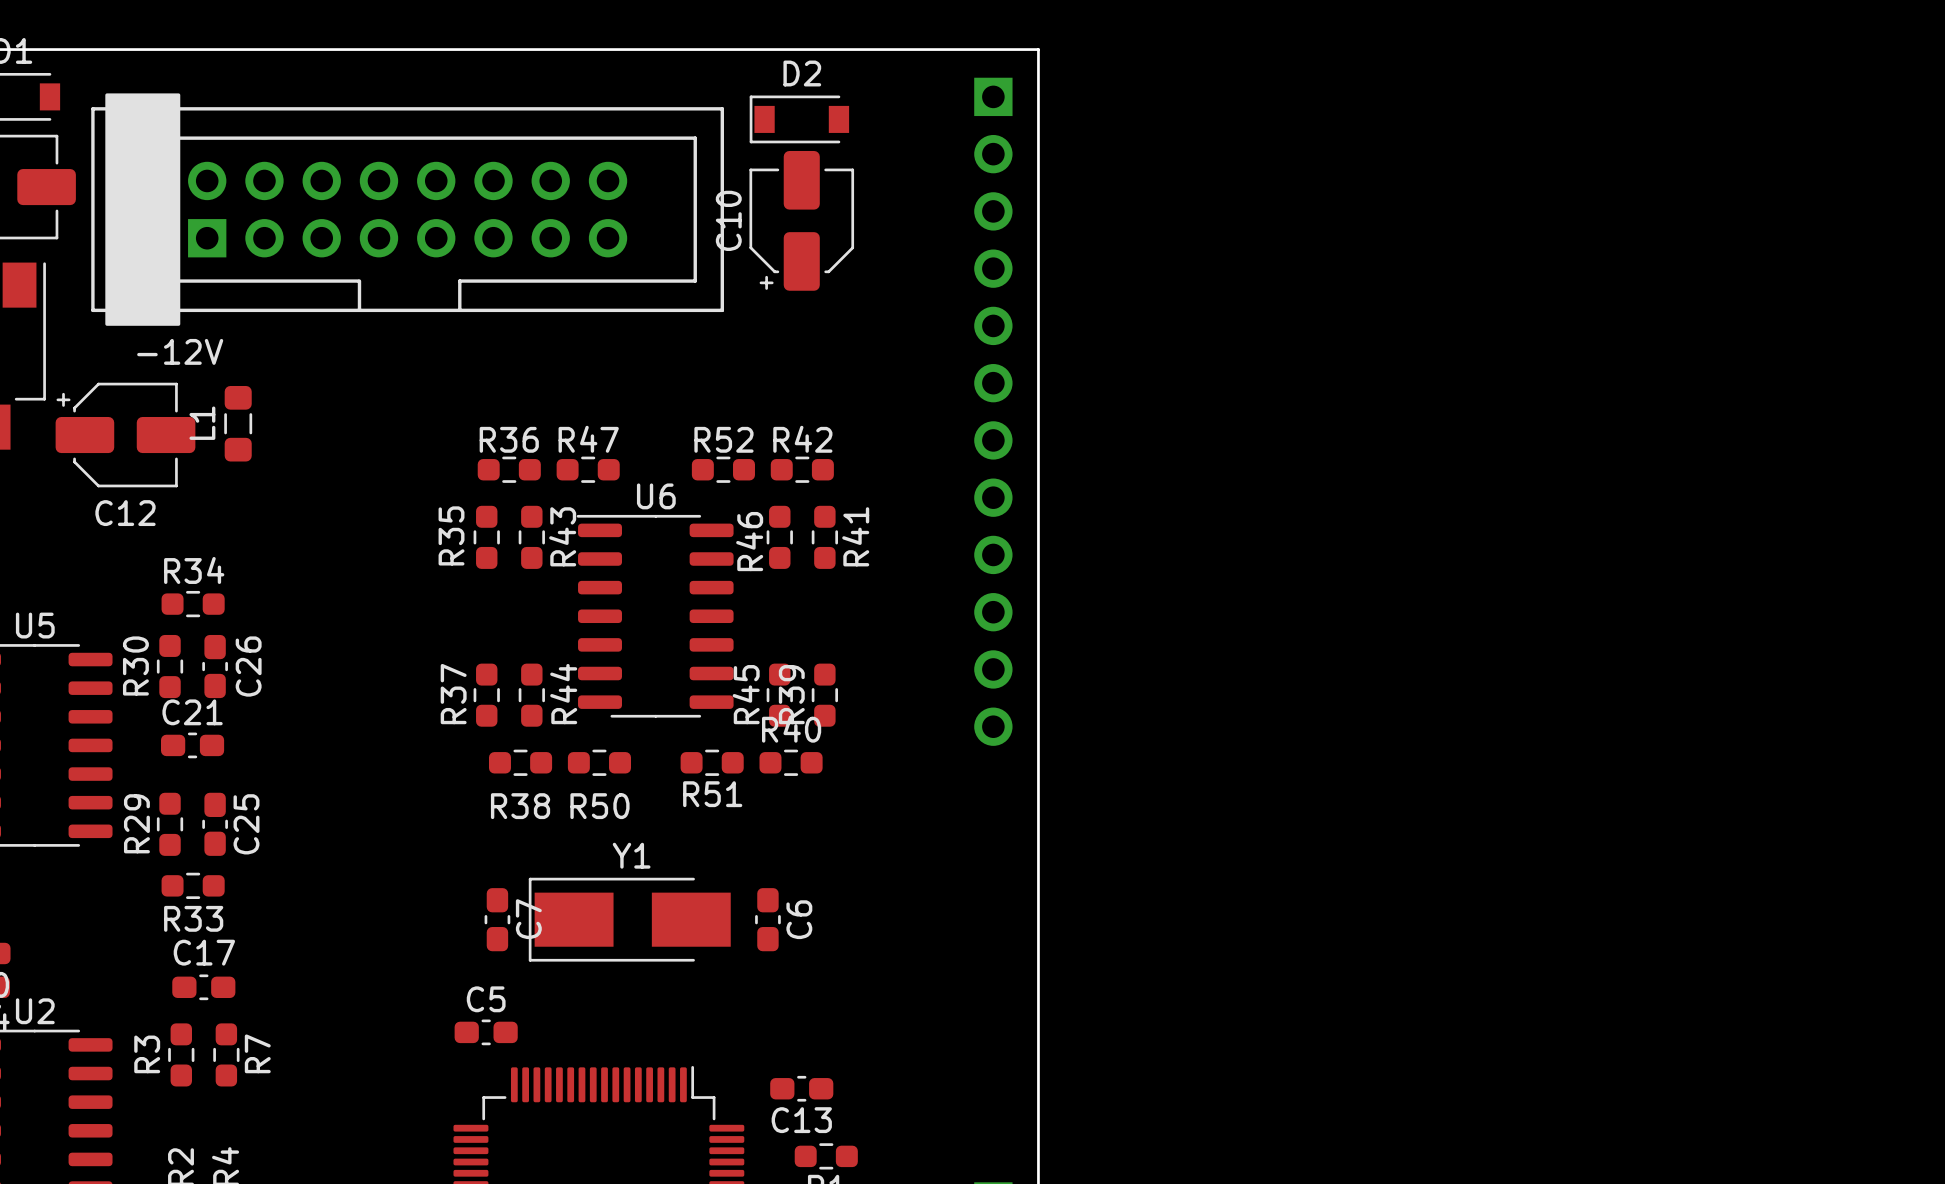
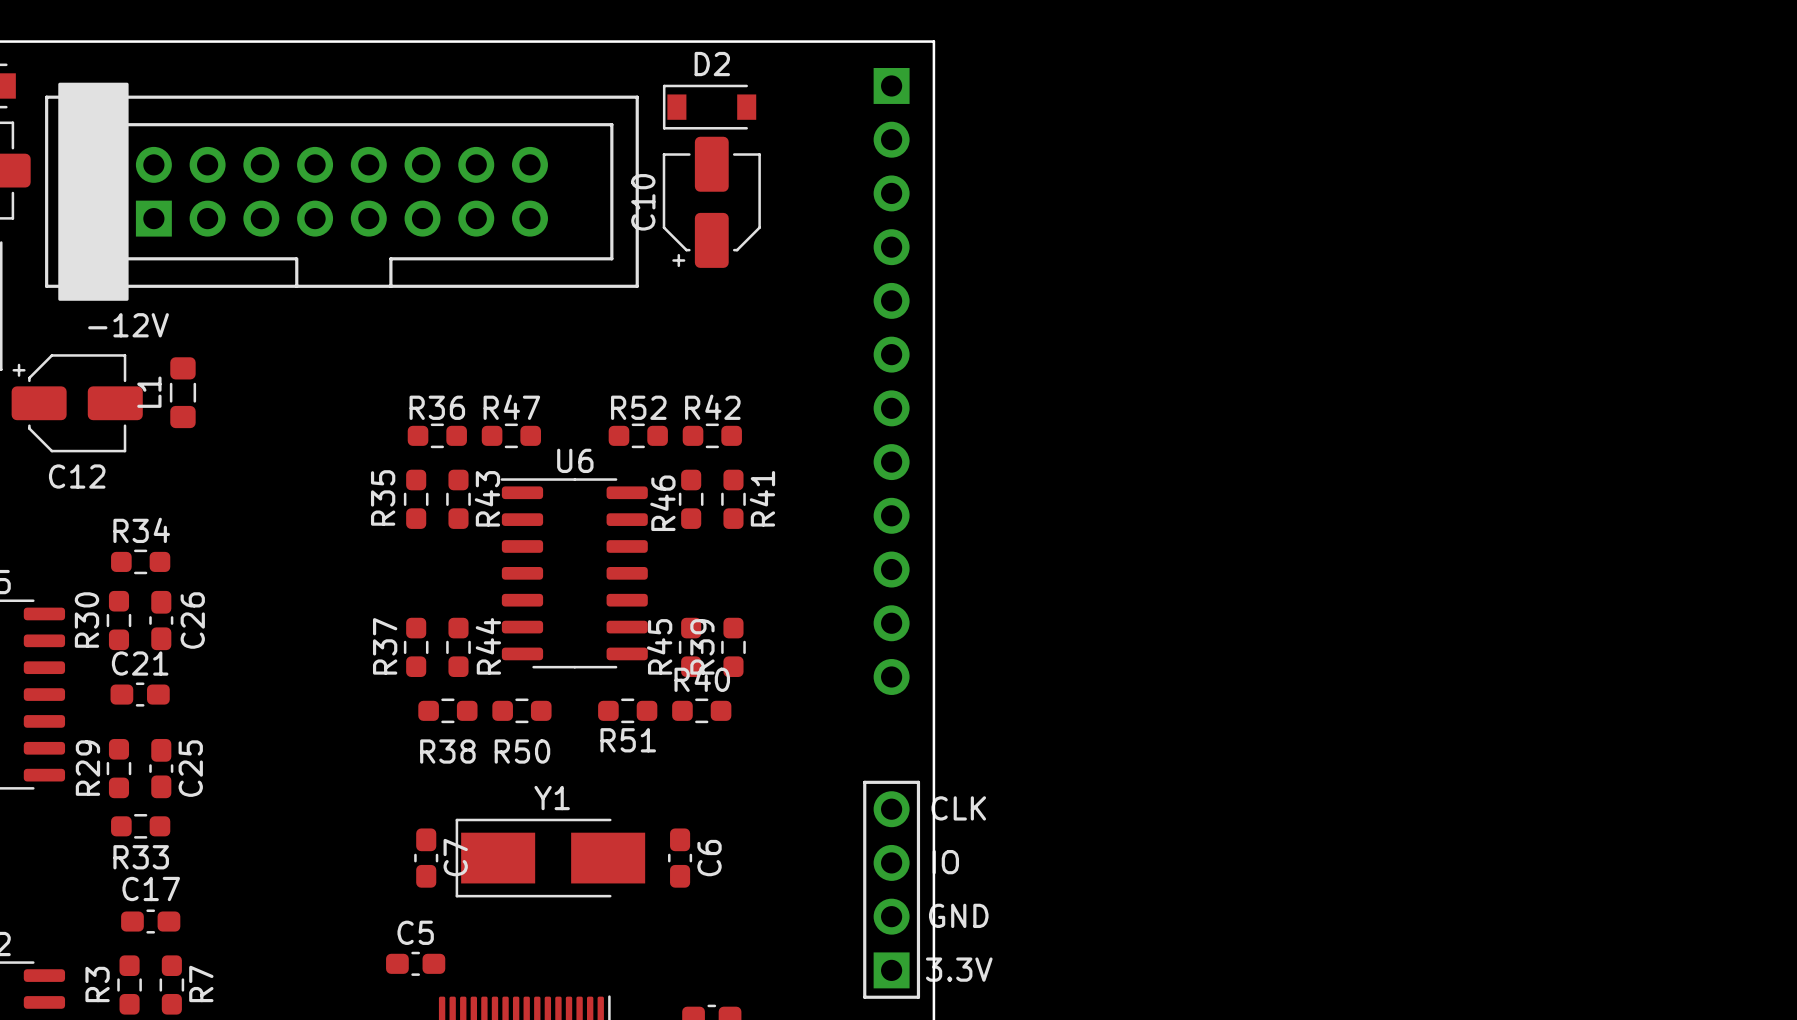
part: none -> (891, 889)

